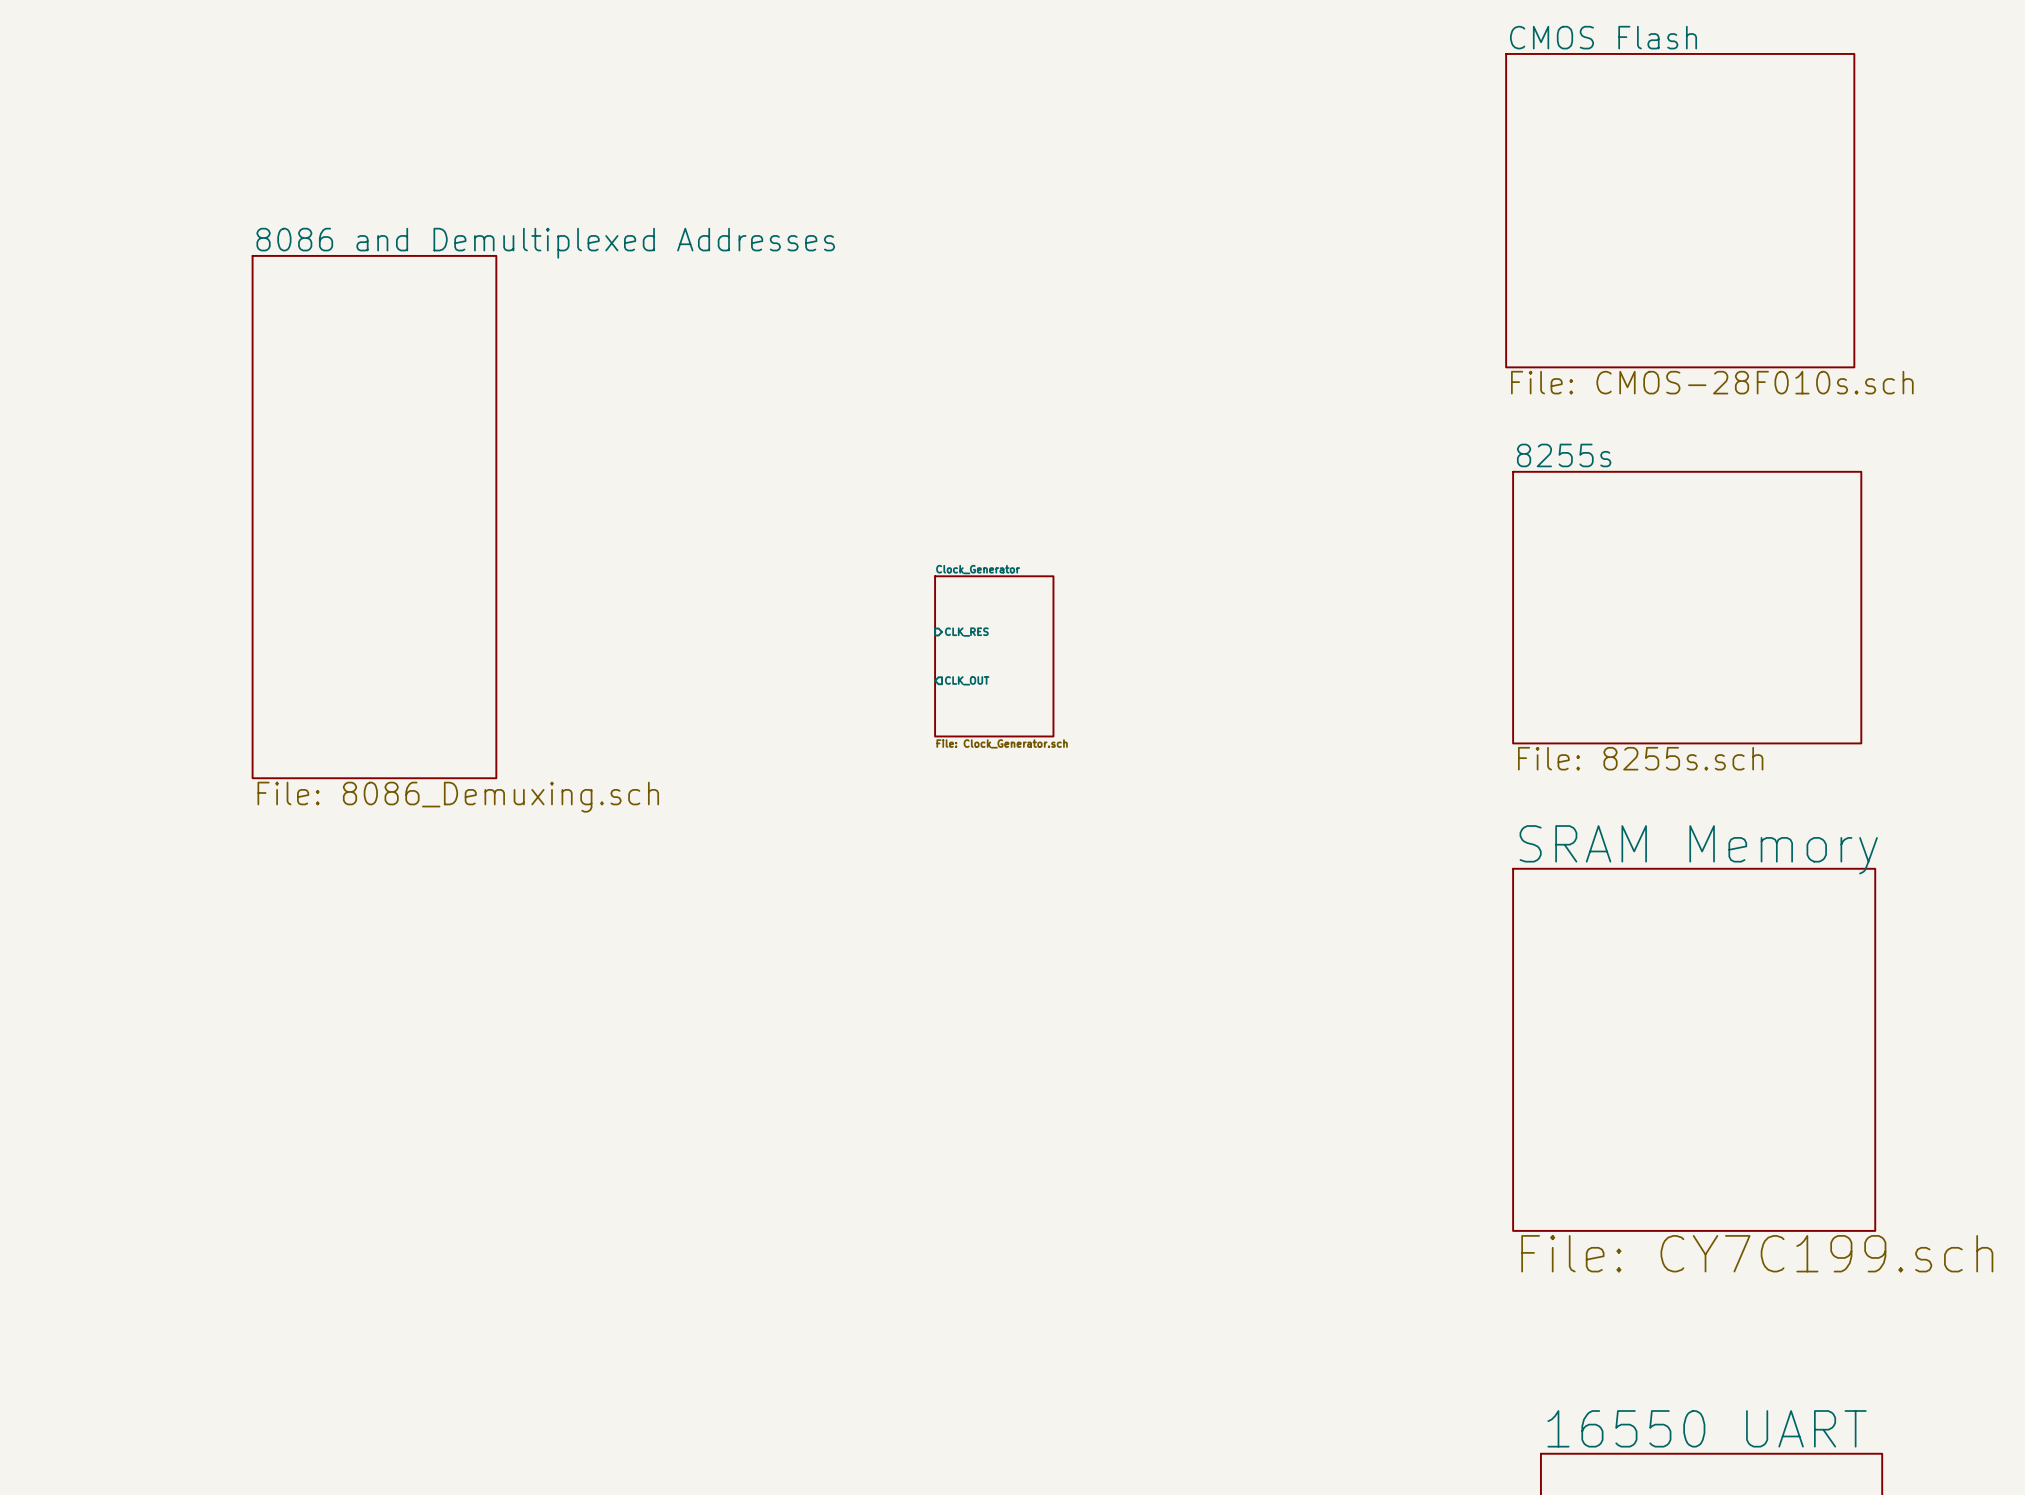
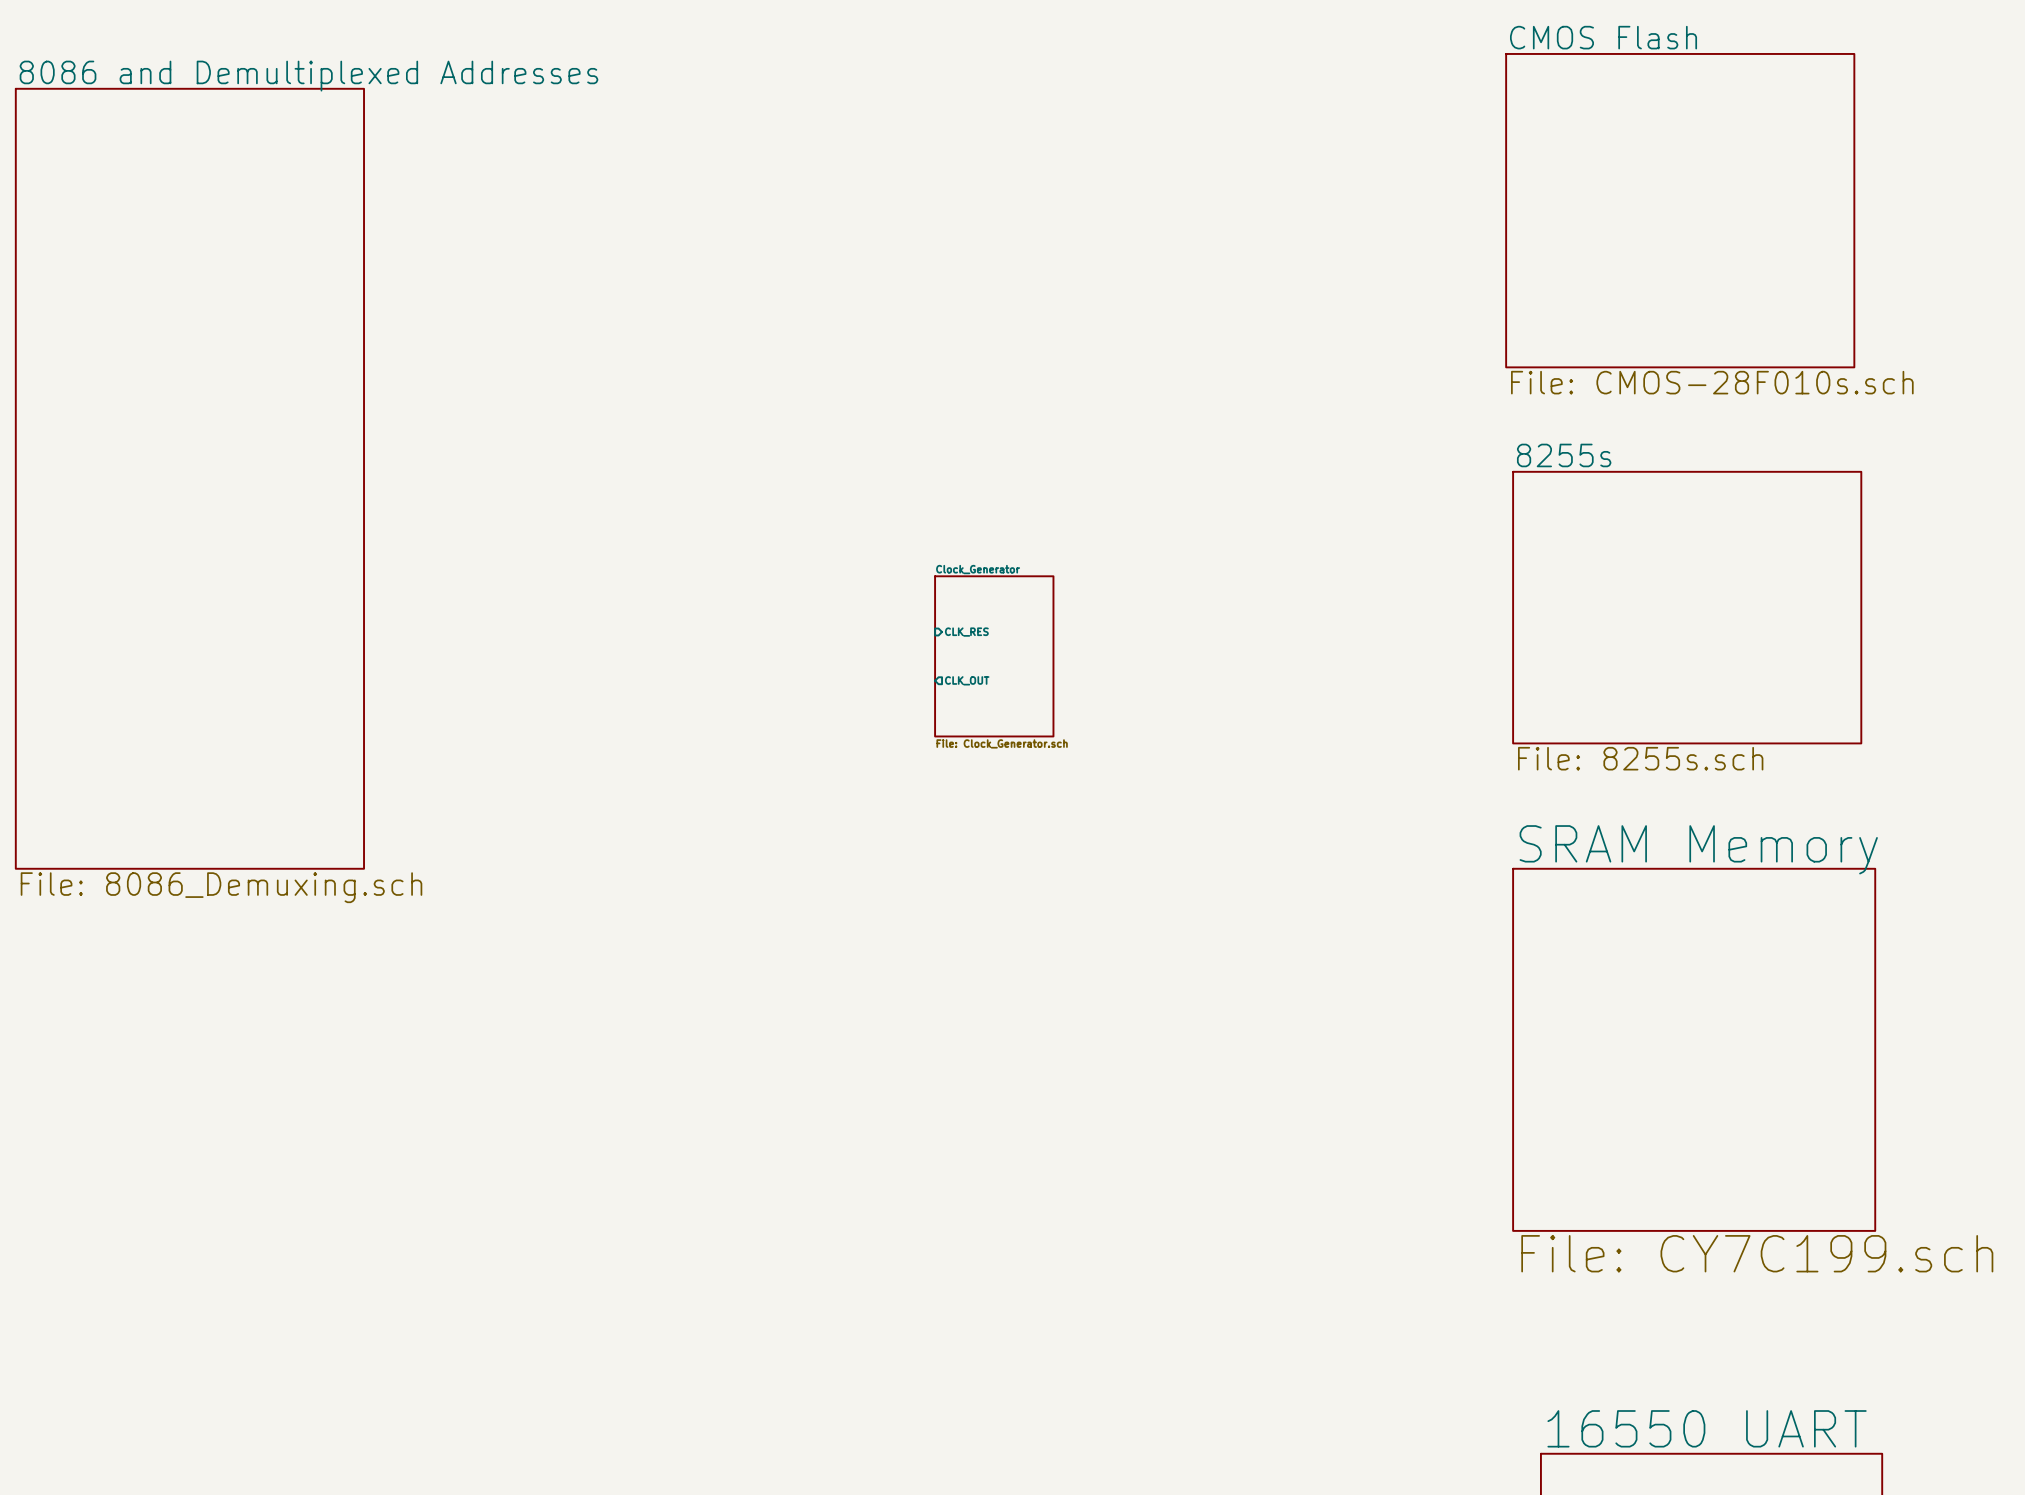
sheet 8086 and Demultiplexed Addresses name position: 8086 and Demultiplexed Addresses (545, 243) -> 8086 and Demultiplexed Addresses (308, 76)
sheet 8086 and Demultiplexed Addresses shape: [252, 255, 497, 779] -> [15, 88, 365, 869]
sheet 8086 and Demultiplexed Addresses value position: File: 8086_Demuxing.sch (458, 797) -> File: 8086_Demuxing.sch (221, 887)

